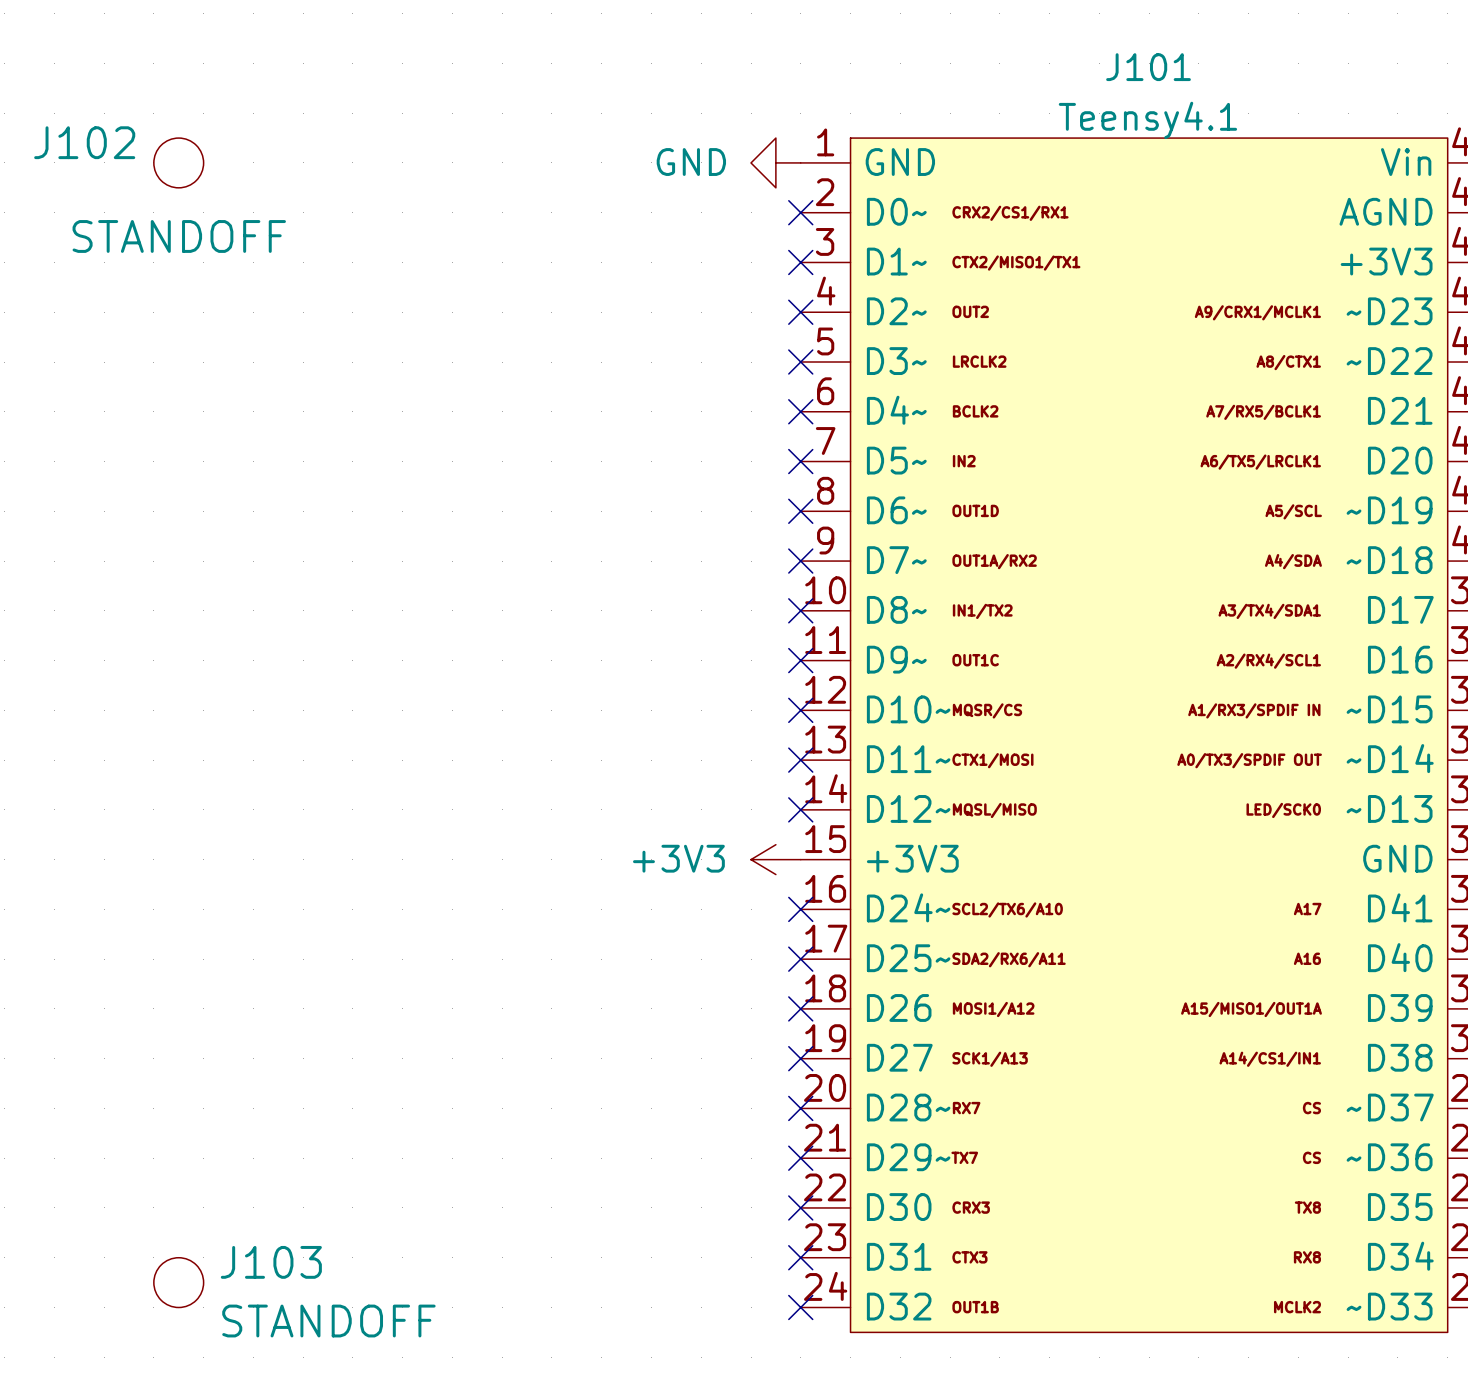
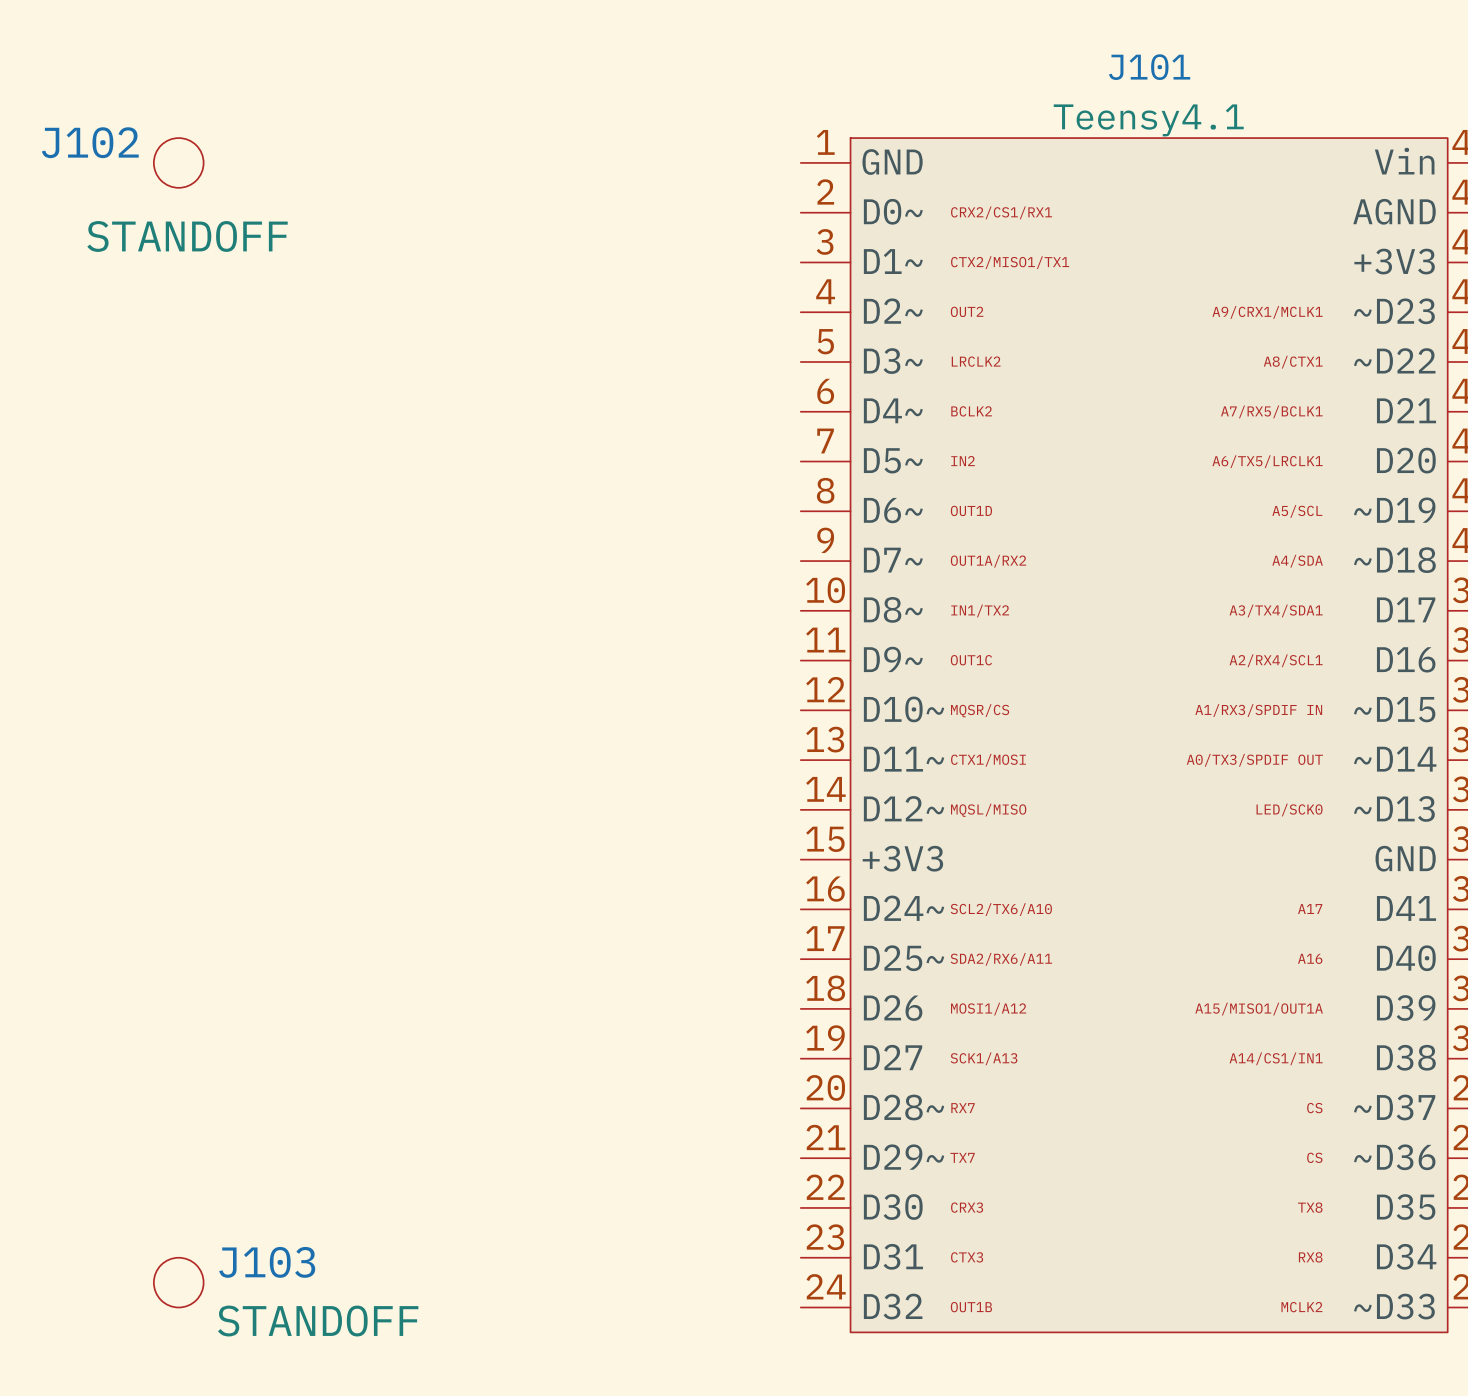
power symbol: GND (775, 162) -> none
no-connect mark: (800, 212) -> none
no-connect mark: (800, 262) -> none
no-connect mark: (800, 312) -> none
no-connect mark: (800, 362) -> none
no-connect mark: (800, 411) -> none
no-connect mark: (800, 461) -> none
no-connect mark: (800, 511) -> none
no-connect mark: (800, 561) -> none
no-connect mark: (800, 610) -> none
no-connect mark: (800, 660) -> none
no-connect mark: (800, 710) -> none
no-connect mark: (800, 760) -> none
no-connect mark: (800, 809) -> none
power symbol: +3V3 (775, 859) -> none
no-connect mark: (800, 909) -> none
no-connect mark: (800, 959) -> none
no-connect mark: (800, 1008) -> none
no-connect mark: (800, 1058) -> none
no-connect mark: (800, 1108) -> none
no-connect mark: (800, 1158) -> none
no-connect mark: (800, 1207) -> none
no-connect mark: (800, 1257) -> none
no-connect mark: (800, 1307) -> none

